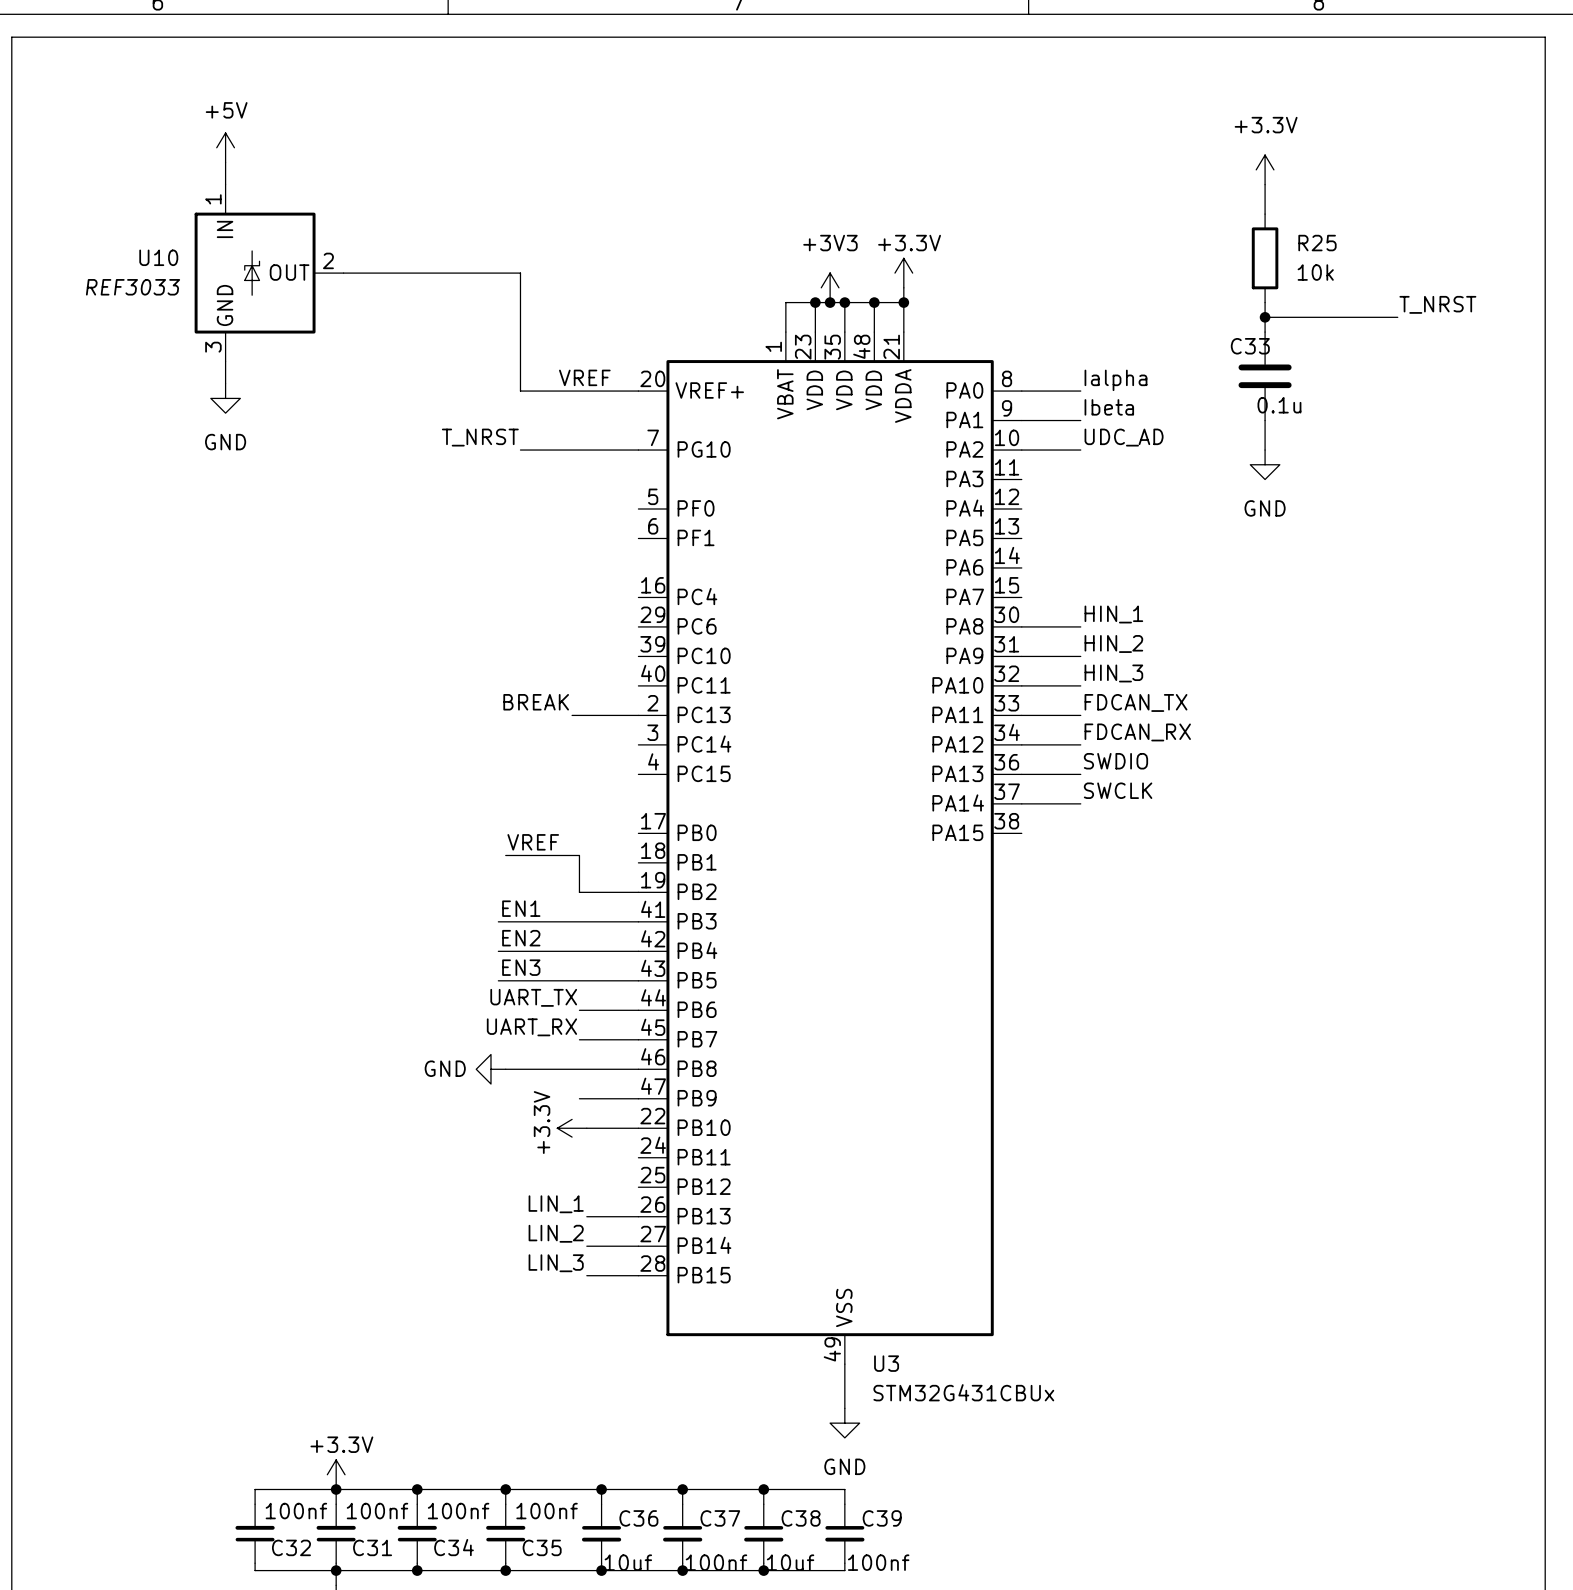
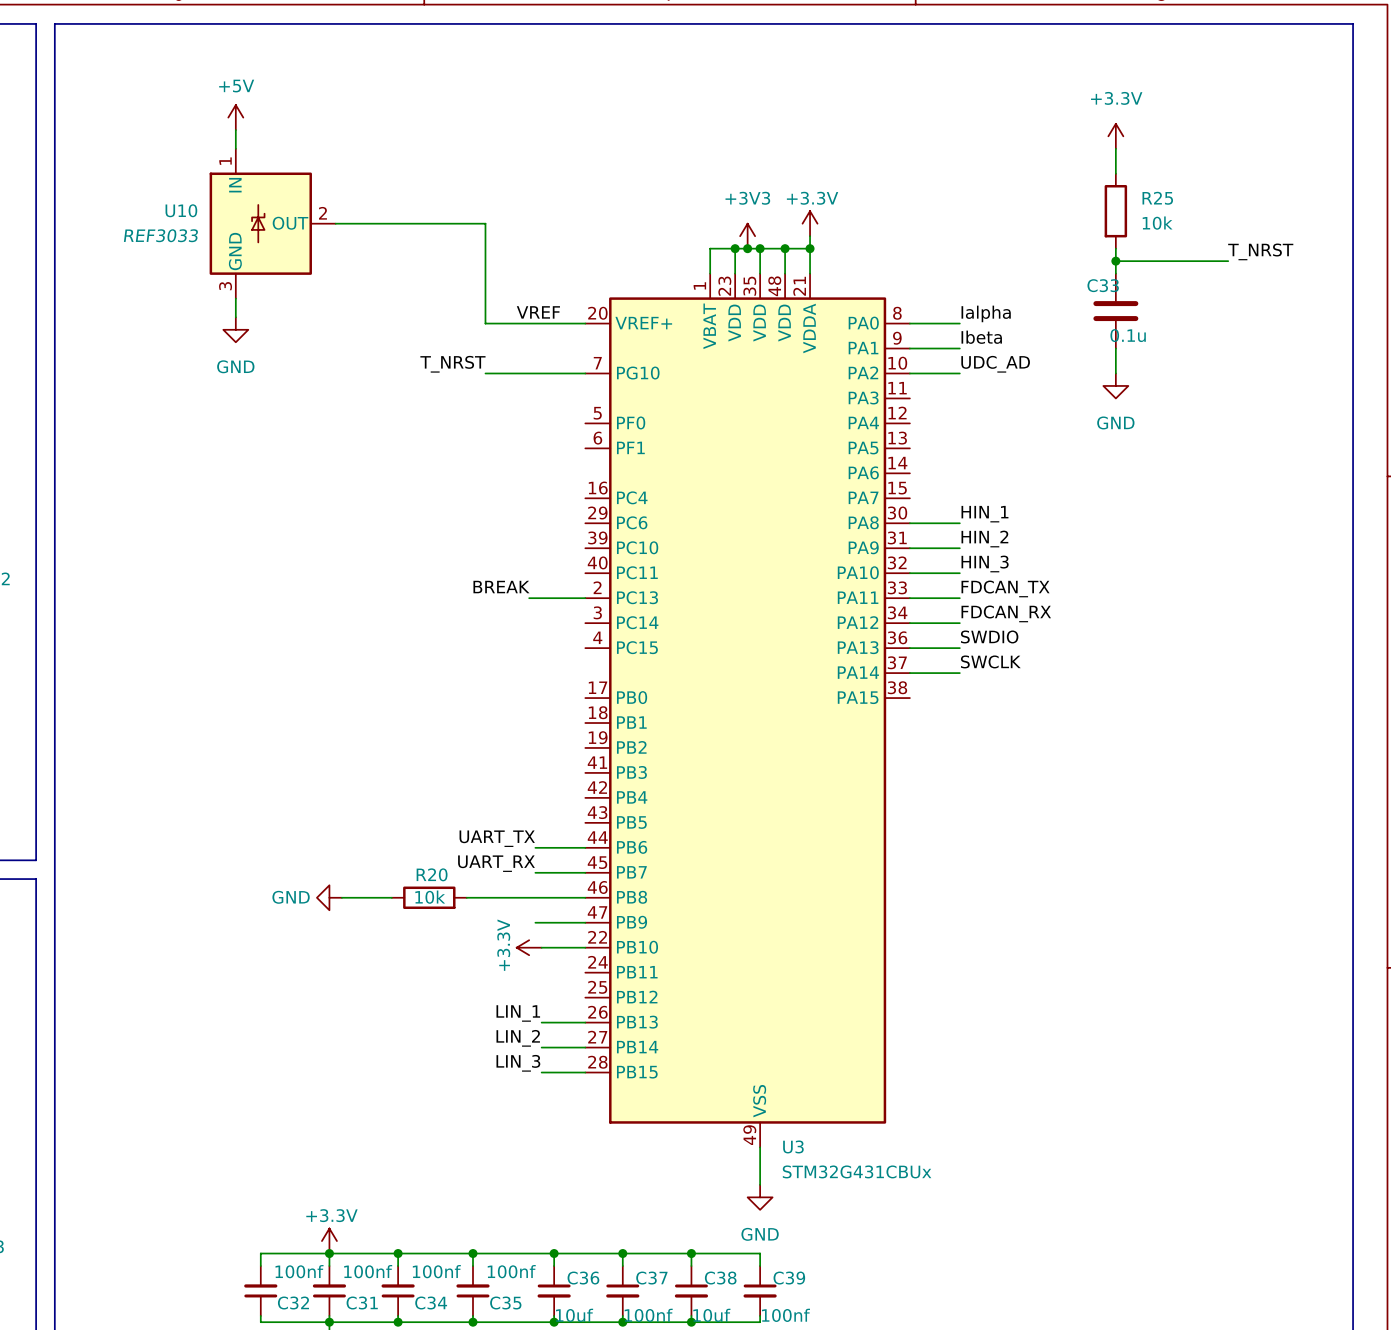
label: VREF (533, 842) -> none
wire: (505, 855) (579, 855) (579, 892) (638, 892) -> none
label: EN1 (521, 908) -> none
wire: (498, 921) (638, 921) -> none
label: EN2 (521, 938) -> none
wire: (498, 951) (638, 951) -> none
label: EN3 (521, 967) -> none
wire: (498, 980) (638, 980) -> none
wire: none -> (341, 897) (391, 897)
R20: none -> 10k (429, 897)
power symbol position: GND (490, 1069) -> GND (329, 897)

